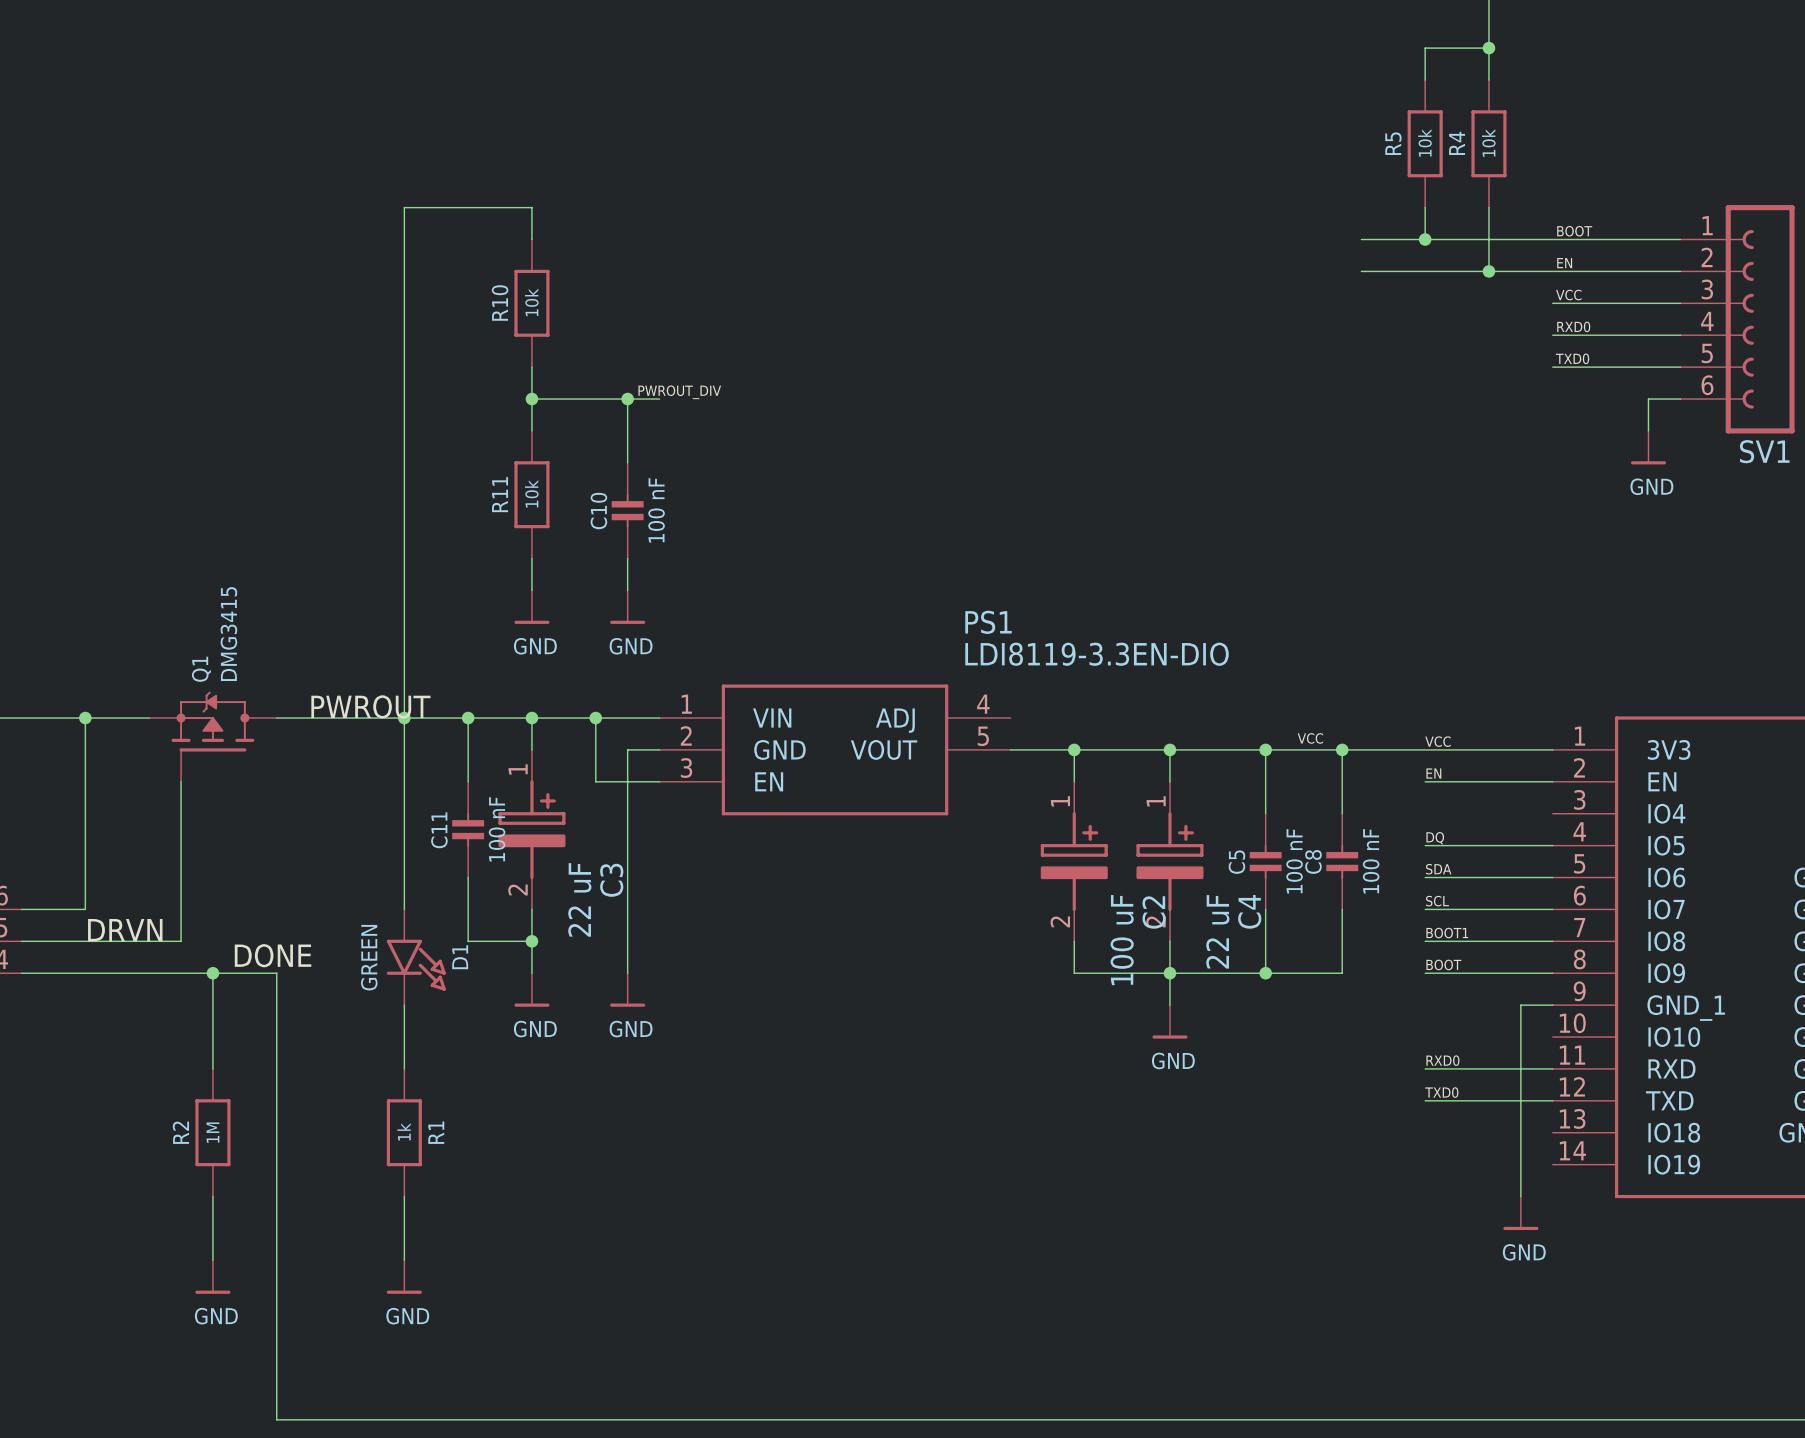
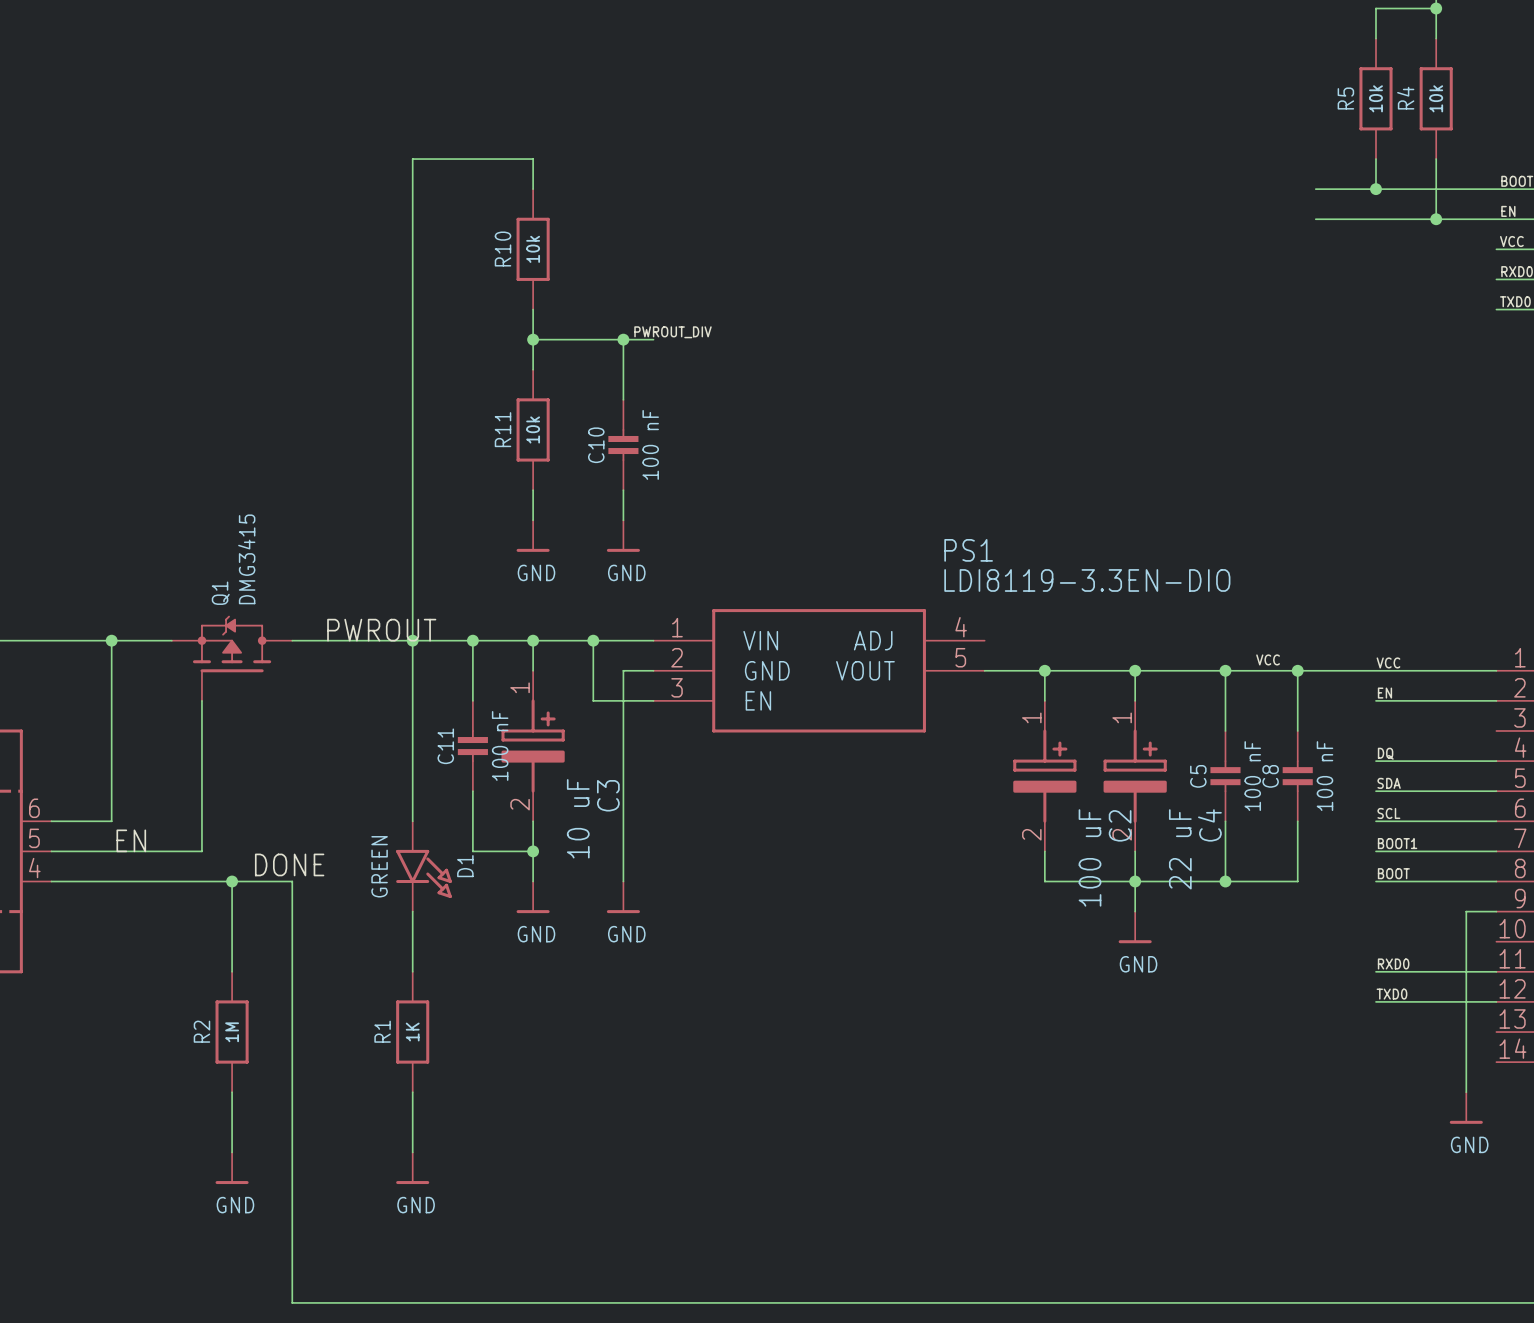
C3 value: 22 uF (579, 899) -> 10 uF (578, 818)
label: DRVN (125, 930) -> EN (131, 840)
R1 value: 1k (404, 1131) -> 1K (412, 1032)
R1 name position: R1 (436, 1132) -> R1 (382, 1031)

